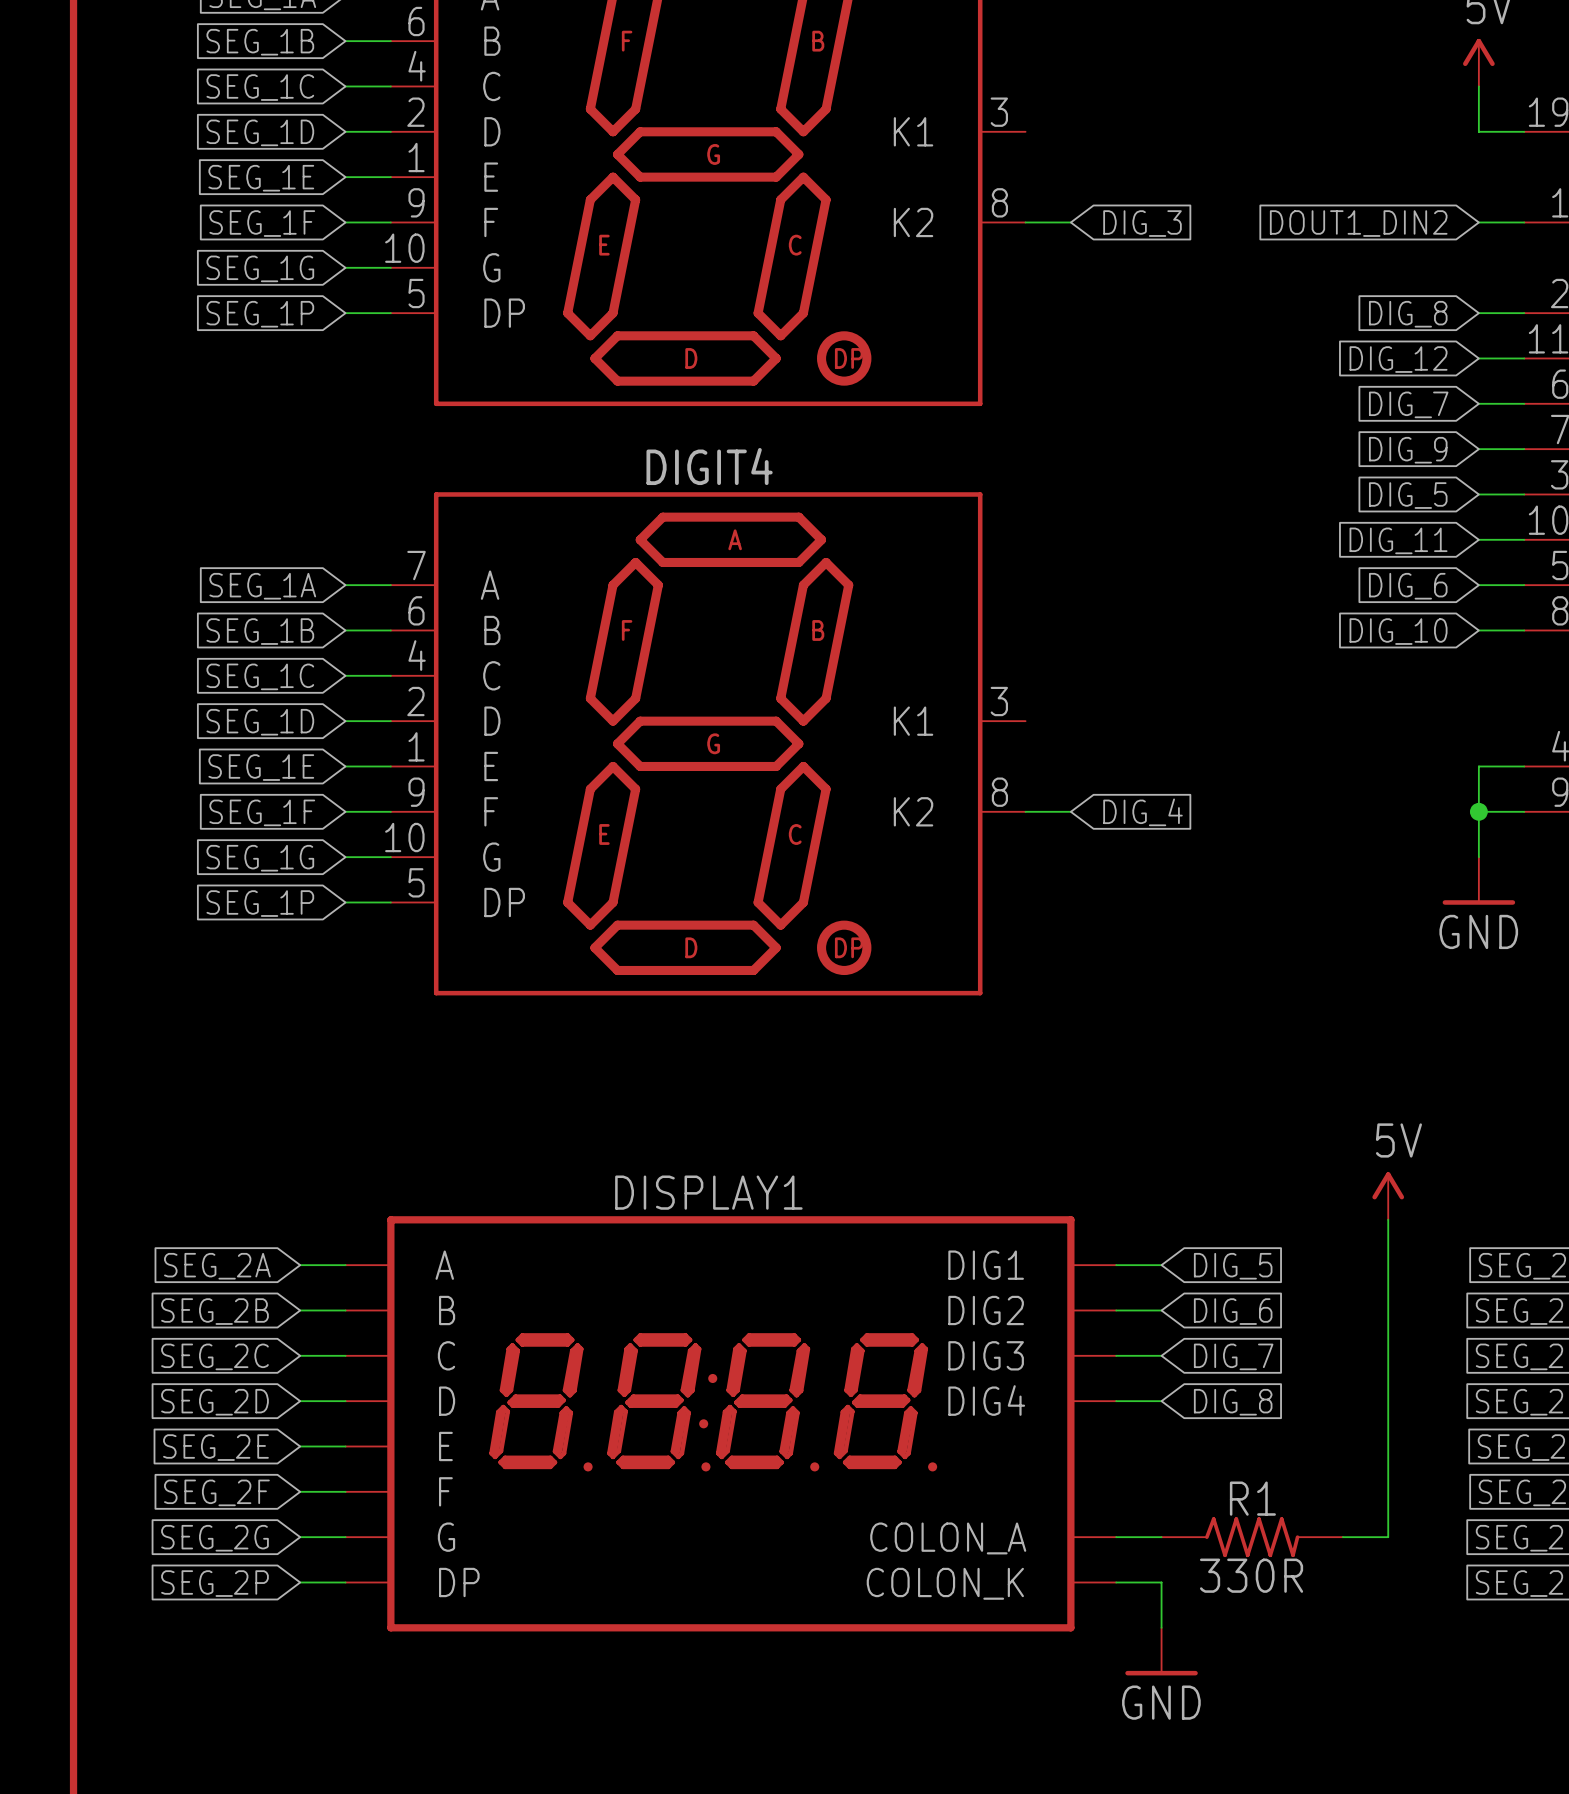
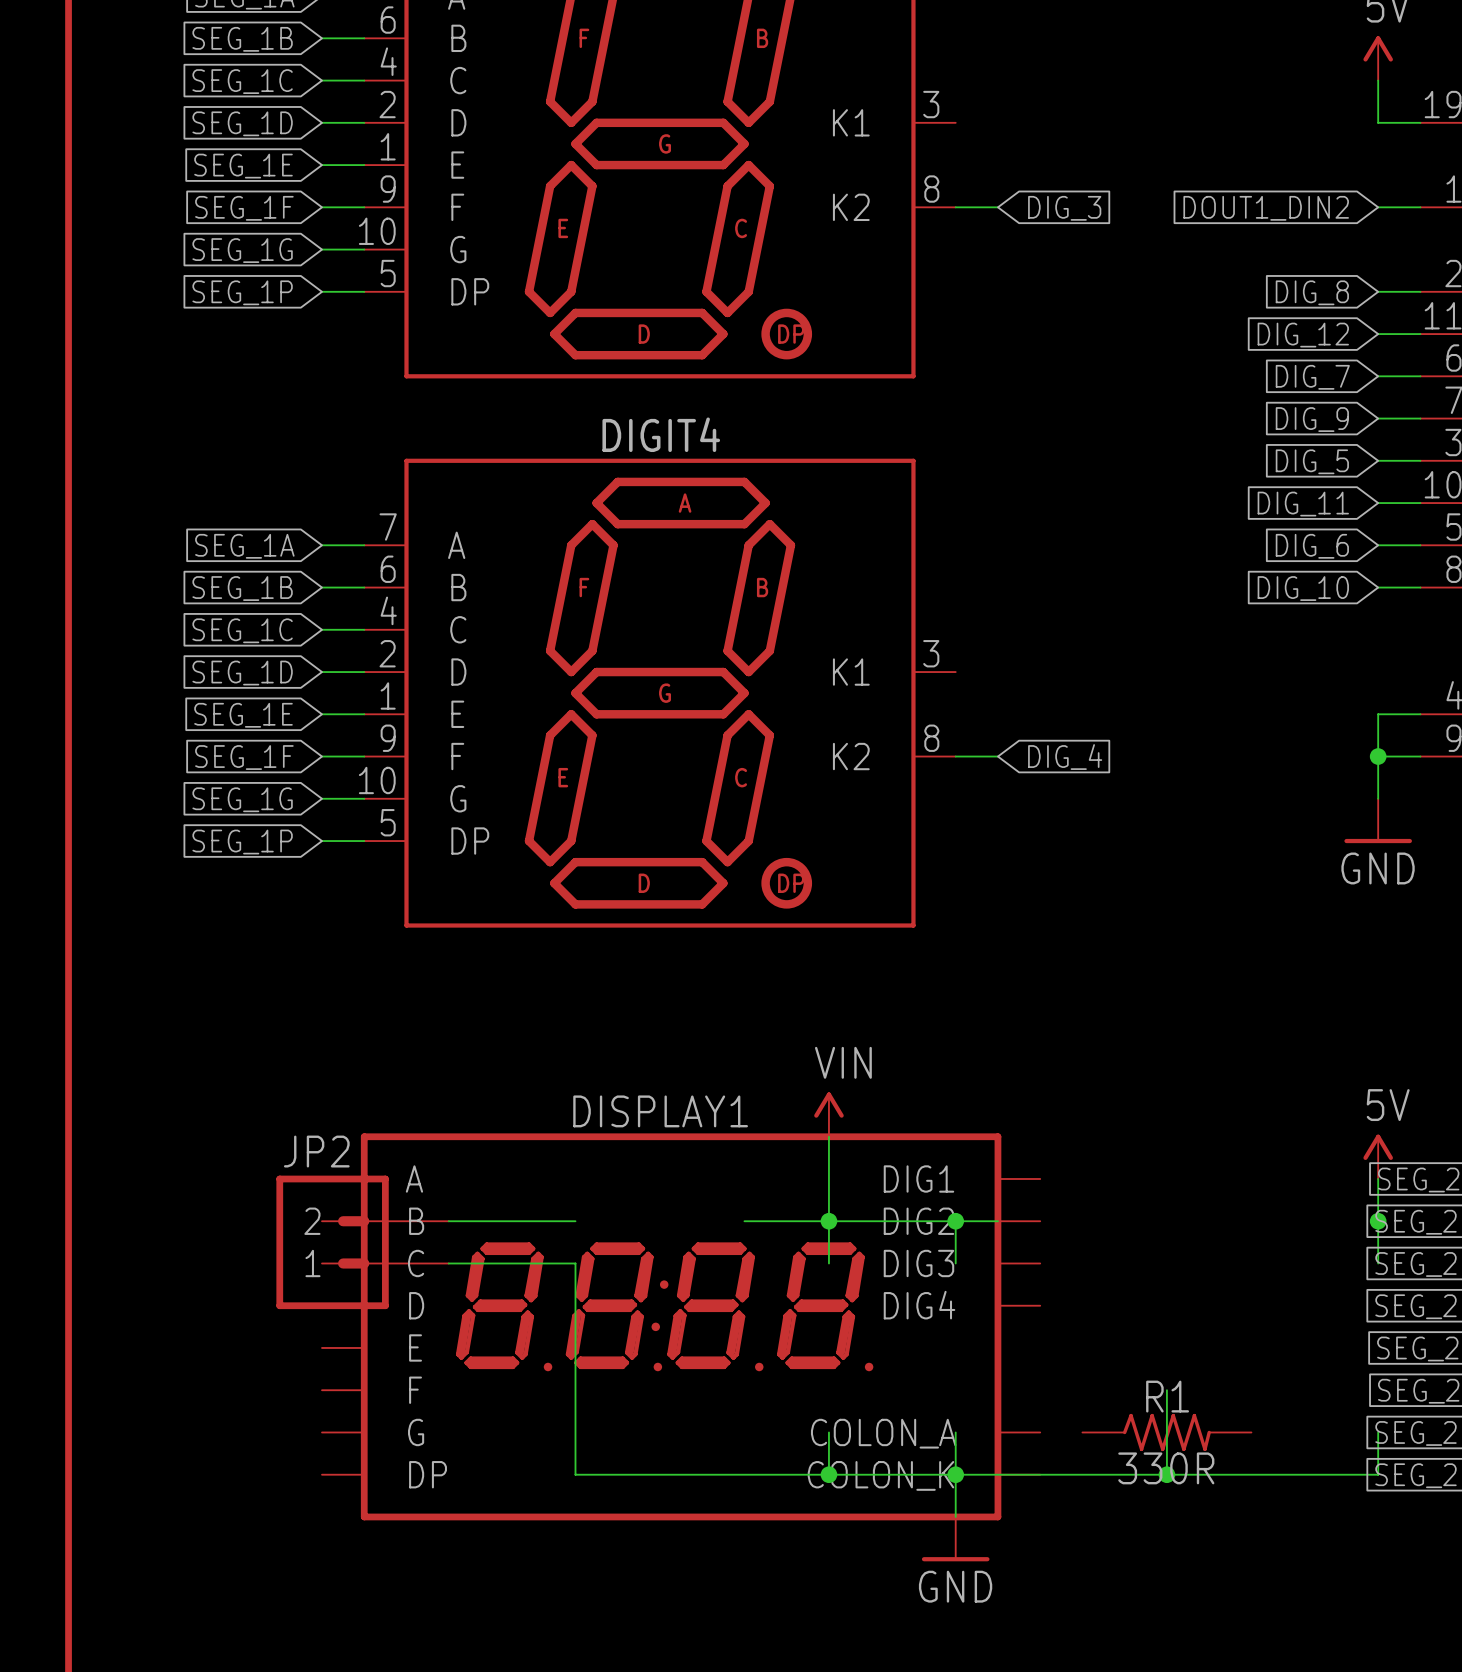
power symbol: none -> VIN (828, 1114)
power symbol position: 5V (1388, 1196) -> 5V (1378, 1156)
wire: none -> (828, 1136) (828, 1263)
wire: (1388, 1219) (1388, 1537) (1342, 1537) -> none
wire: (1116, 1265) (1161, 1265) -> none
wire: none -> (1378, 1178) (1378, 1263)
global label: SEG_2A (217, 1266) -> none
global label: DIG_5 (1233, 1266) -> none
wire: (300, 1310) (345, 1310) -> none
wire: none -> (448, 1221) (575, 1221)
wire: none -> (744, 1221) (997, 1221)
junction: none -> (828, 1221)
wire: none -> (955, 1221) (955, 1263)
junction: none -> (955, 1221)
wire: (1116, 1310) (1161, 1310) -> none
junction: none -> (1378, 1221)
global label: SEG_2B (214, 1311) -> none
global label: DIG_6 (1233, 1311) -> none
JP2: none -> (362, 1242)
wire: (300, 1355) (345, 1355) -> none
wire: none -> (448, 1263) (575, 1263) (575, 1474) (1040, 1474)
wire: (1116, 1355) (1161, 1355) -> none
global label: SEG_2C (214, 1356) -> none
global label: DIG_7 (1233, 1356) -> none
wire: (1116, 1401) (1161, 1401) -> none
global label: SEG_2D (214, 1402) -> none
global label: DIG_8 (1233, 1402) -> none
wire: (300, 1446) (345, 1446) -> none
global label: SEG_2E (215, 1447) -> none
wire: (300, 1491) (345, 1491) -> none
wire: none -> (1166, 1390) (1166, 1474)
global label: SEG_2F (216, 1492) -> none
wire: (300, 1537) (345, 1537) -> none
wire: none -> (828, 1432) (828, 1474)
wire: none -> (955, 1432) (955, 1516)
wire: (1116, 1537) (1161, 1537) -> none
global label: SEG_2G (214, 1538) -> none
wire: (300, 1582) (345, 1582) -> none
junction: none -> (828, 1474)
junction: none -> (955, 1474)
wire: (1161, 1582) (1161, 1627) -> (1082, 1474) (1378, 1474) (1378, 1432)
junction: none -> (1166, 1474)
global label: SEG_2P (214, 1583) -> none
power symbol position: GND (1161, 1651) -> GND (955, 1539)

